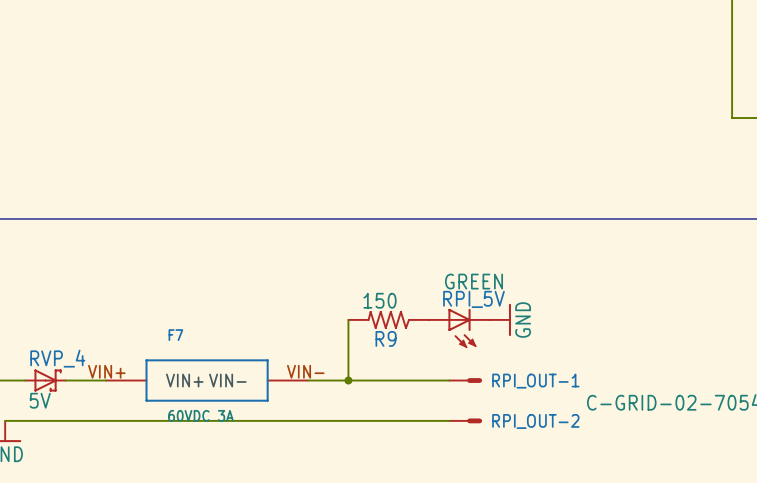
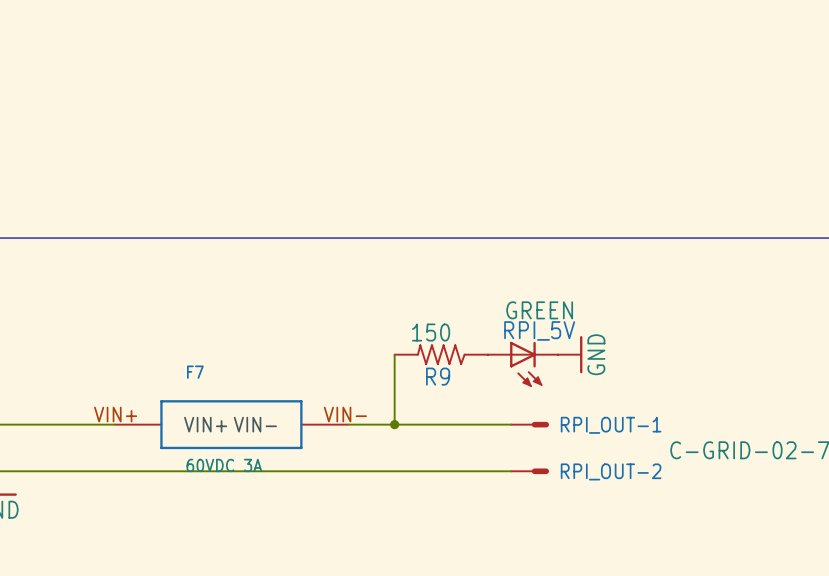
RVP_4: 5V (45, 380) -> none

